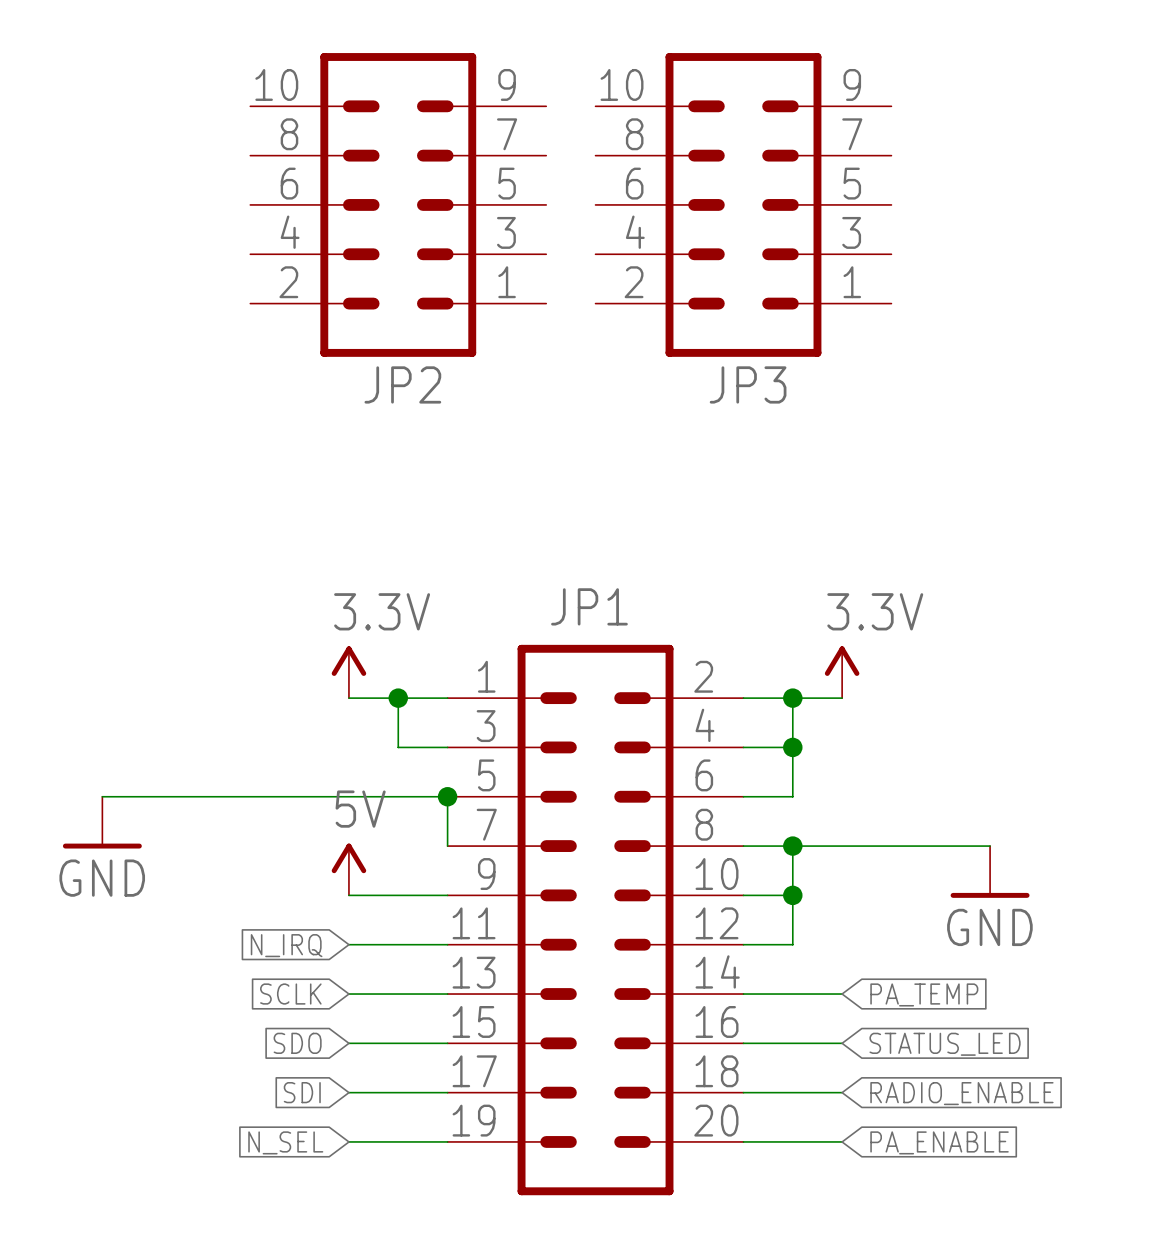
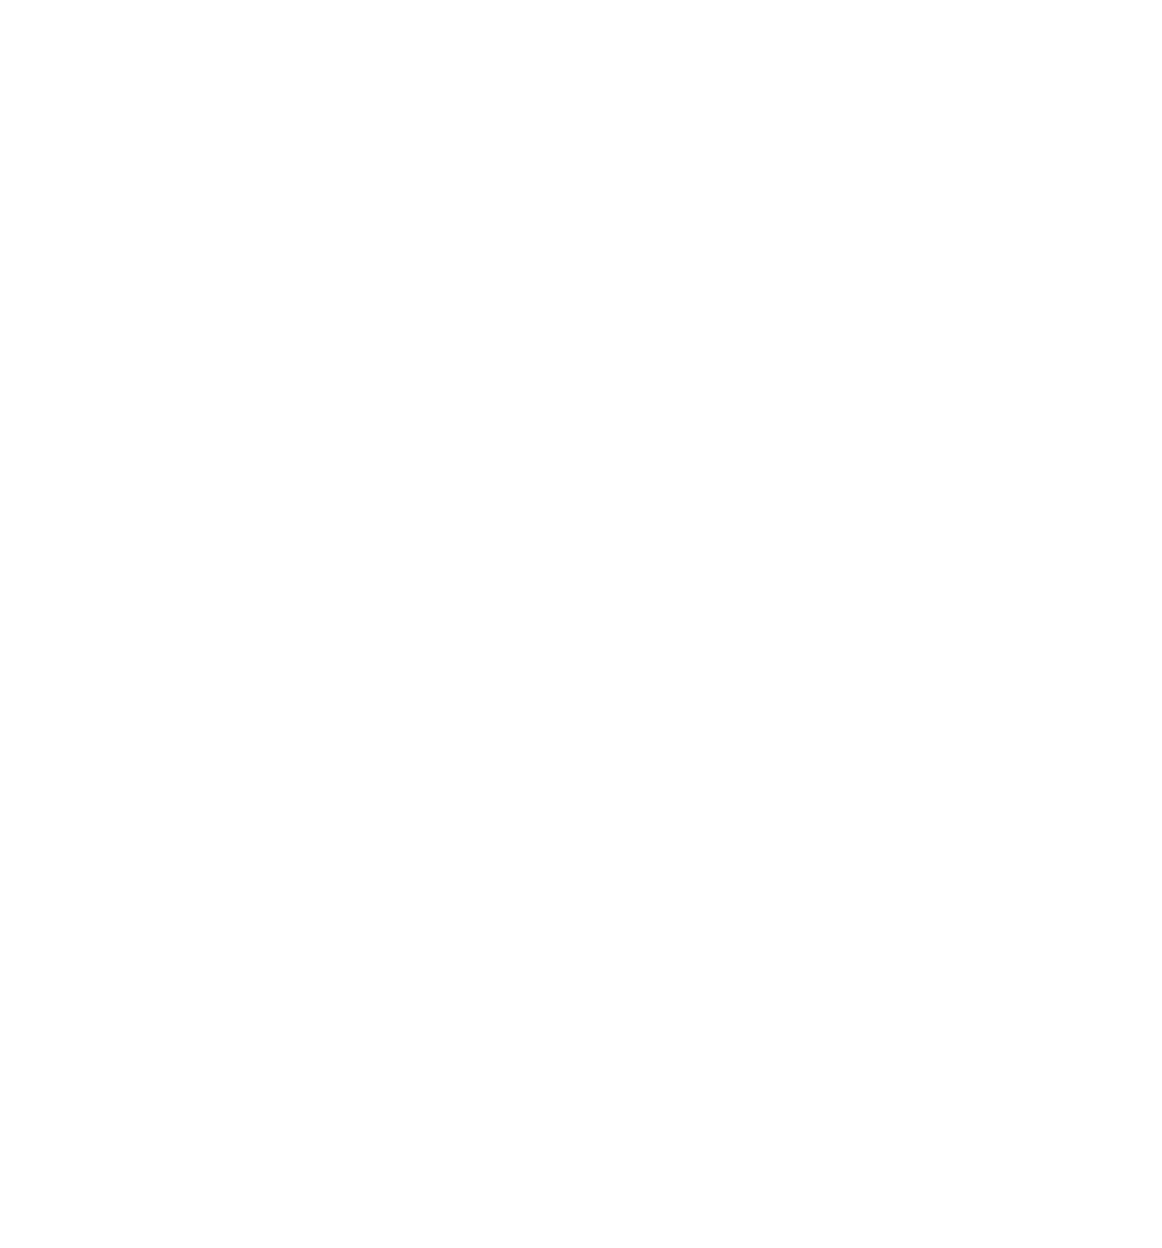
JP2: (398, 204) -> none
JP3: (743, 204) -> none
power symbol: 3.3V (348, 672) -> none
power symbol: 3.3V (842, 672) -> none
wire: (348, 698) (447, 698) -> none
wire: (398, 698) (398, 747) (447, 747) -> none
junction: (398, 698) -> none
wire: (743, 698) (842, 698) -> none
wire: (792, 698) (792, 796) (743, 796) -> none
junction: (792, 698) -> none
wire: (743, 747) (792, 747) -> none
junction: (792, 747) -> none
wire: (102, 796) (447, 796) (447, 846) -> none
junction: (447, 796) -> none
power symbol: GND (102, 822) -> none
wire: (743, 846) (990, 846) -> none
wire: (792, 846) (792, 944) (743, 944) -> none
junction: (792, 846) -> none
power symbol: 5V (348, 869) -> none
power symbol: GND (990, 871) -> none
wire: (348, 895) (447, 895) -> none
wire: (743, 895) (792, 895) -> none
junction: (792, 895) -> none
JP1: (595, 920) -> none
wire: (348, 944) (447, 944) -> none
global label: N_IRQ (286, 945) -> none
global label: SCLK (290, 994) -> none
wire: (348, 994) (447, 994) -> none
wire: (743, 994) (842, 994) -> none
global label: PA_TEMP (924, 994) -> none
global label: SDO (297, 1043) -> none
wire: (348, 1043) (447, 1043) -> none
wire: (743, 1043) (842, 1043) -> none
global label: STATUS_LED (945, 1044) -> none
global label: SDI (302, 1092) -> none
wire: (348, 1092) (447, 1092) -> none
wire: (743, 1092) (842, 1092) -> none
global label: RADIO_ENABLE (961, 1093) -> none
wire: (348, 1141) (447, 1141) -> none
wire: (743, 1141) (842, 1141) -> none
global label: N_SEL (285, 1142) -> none
global label: PA_ENABLE (939, 1142) -> none

